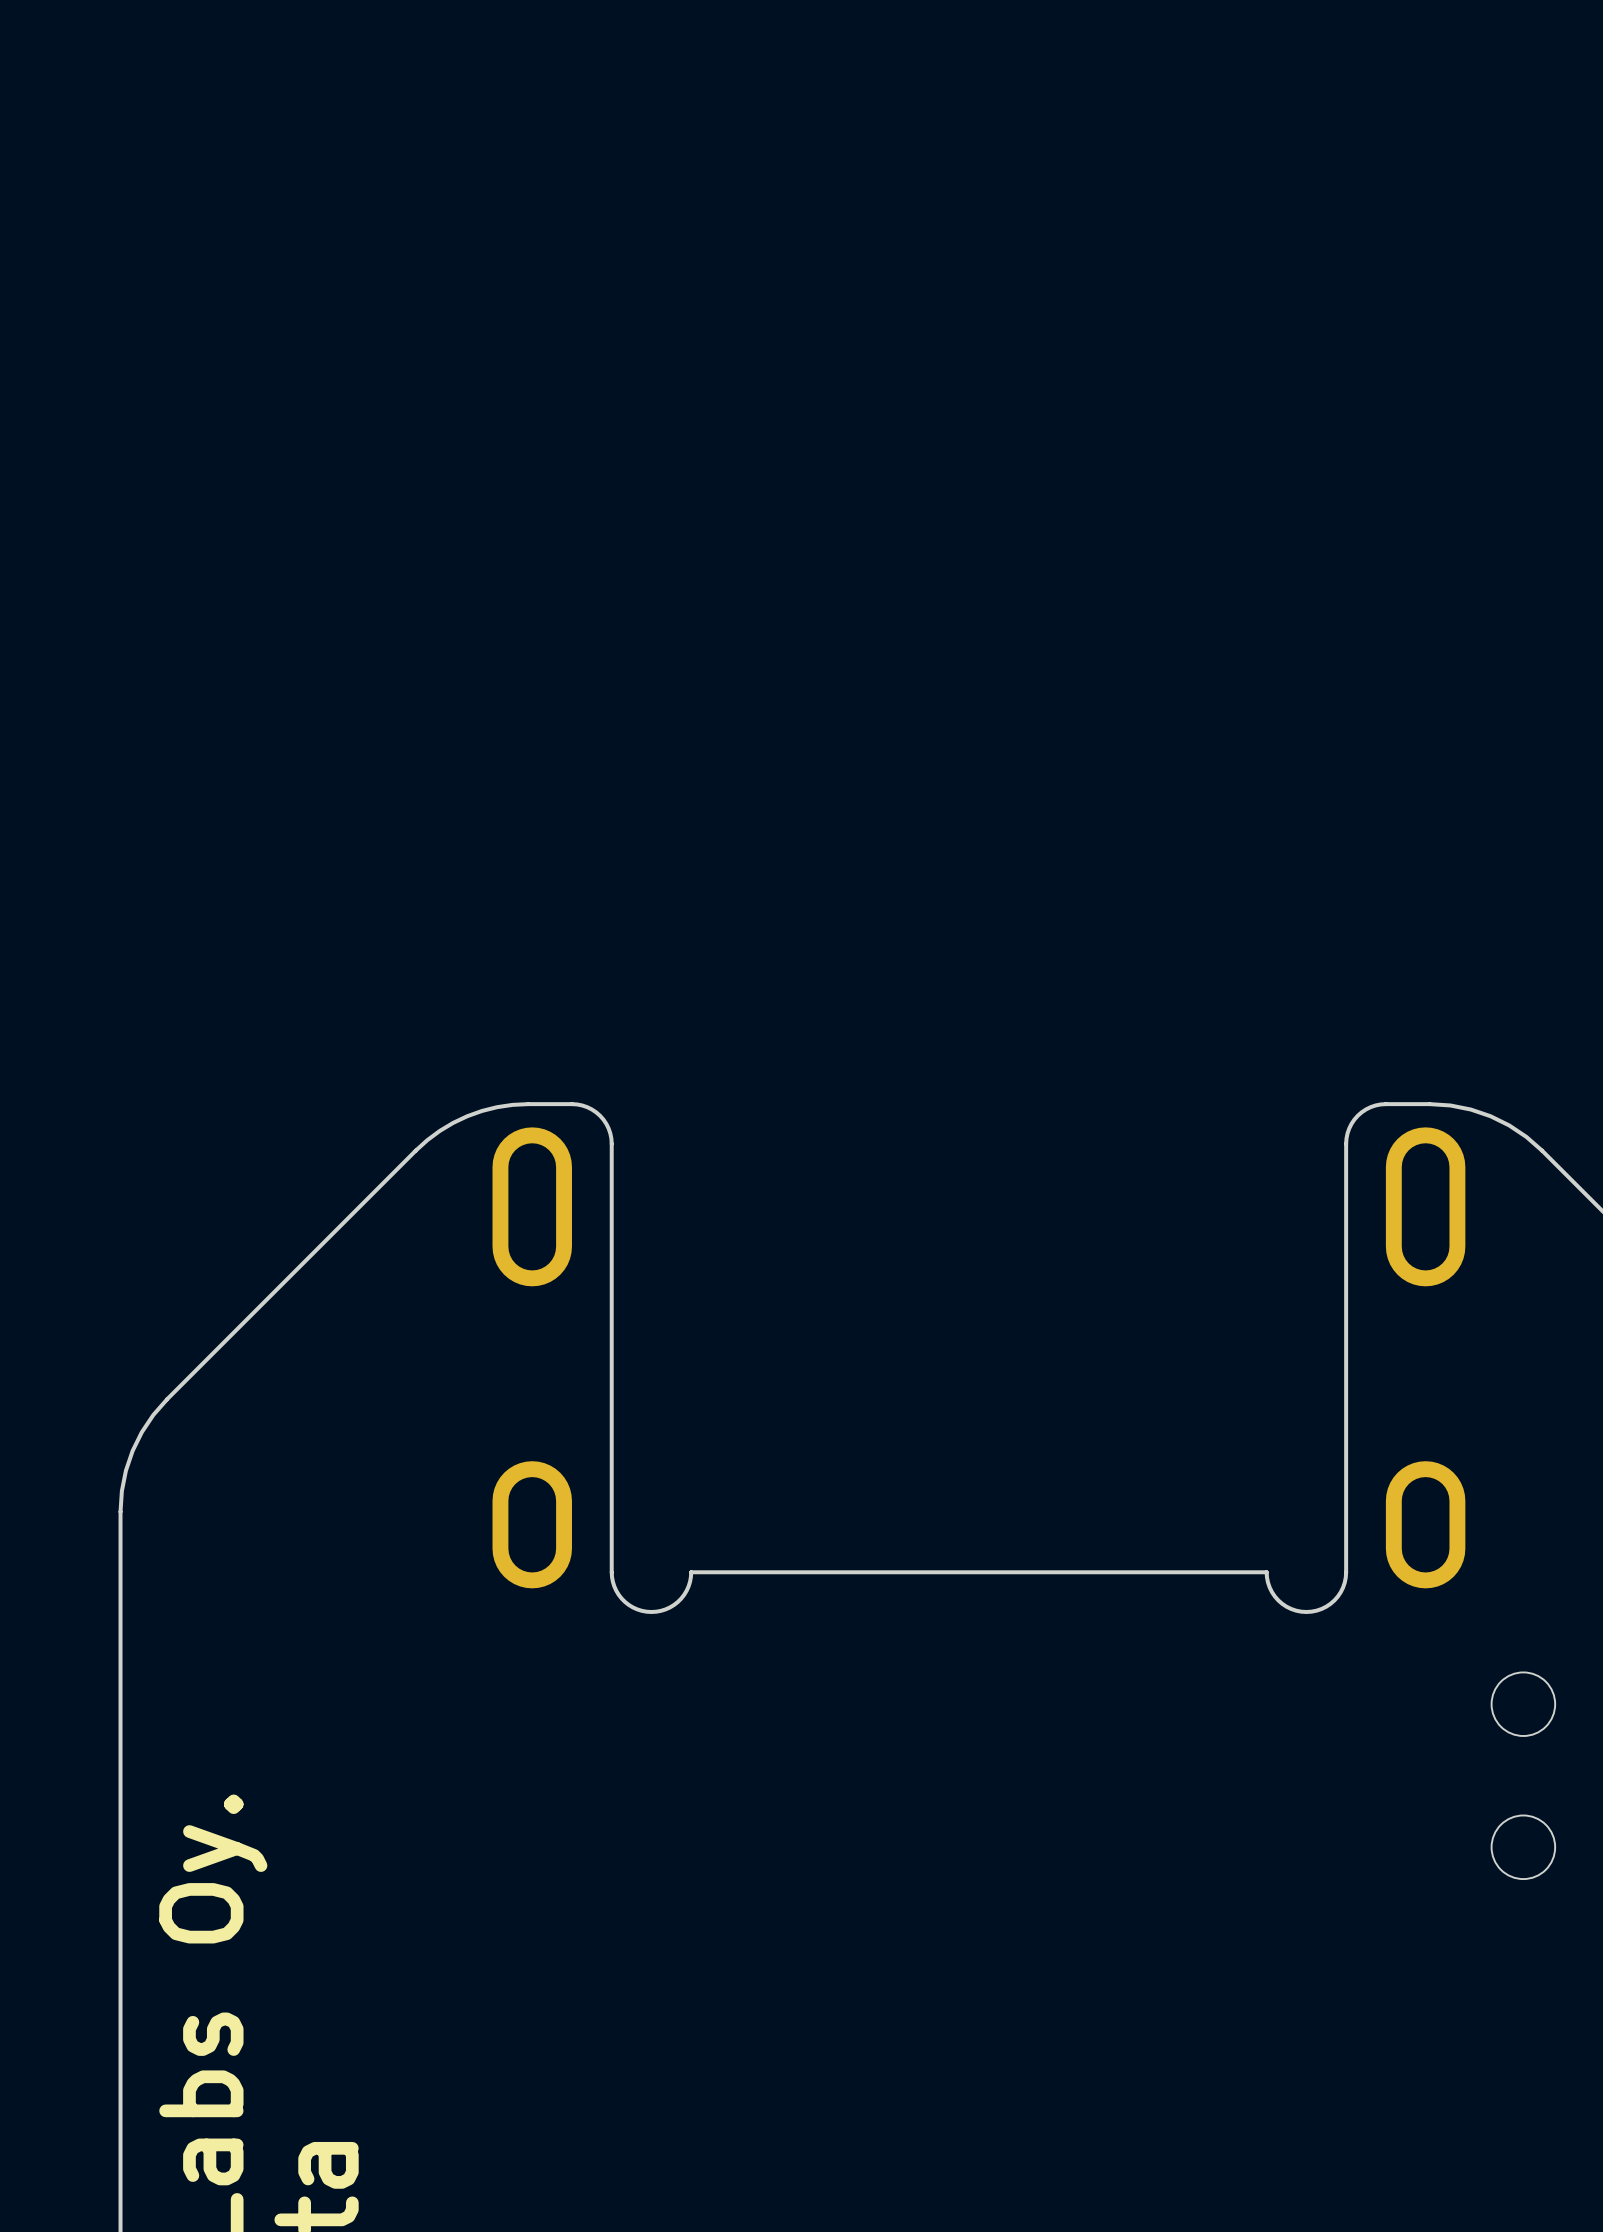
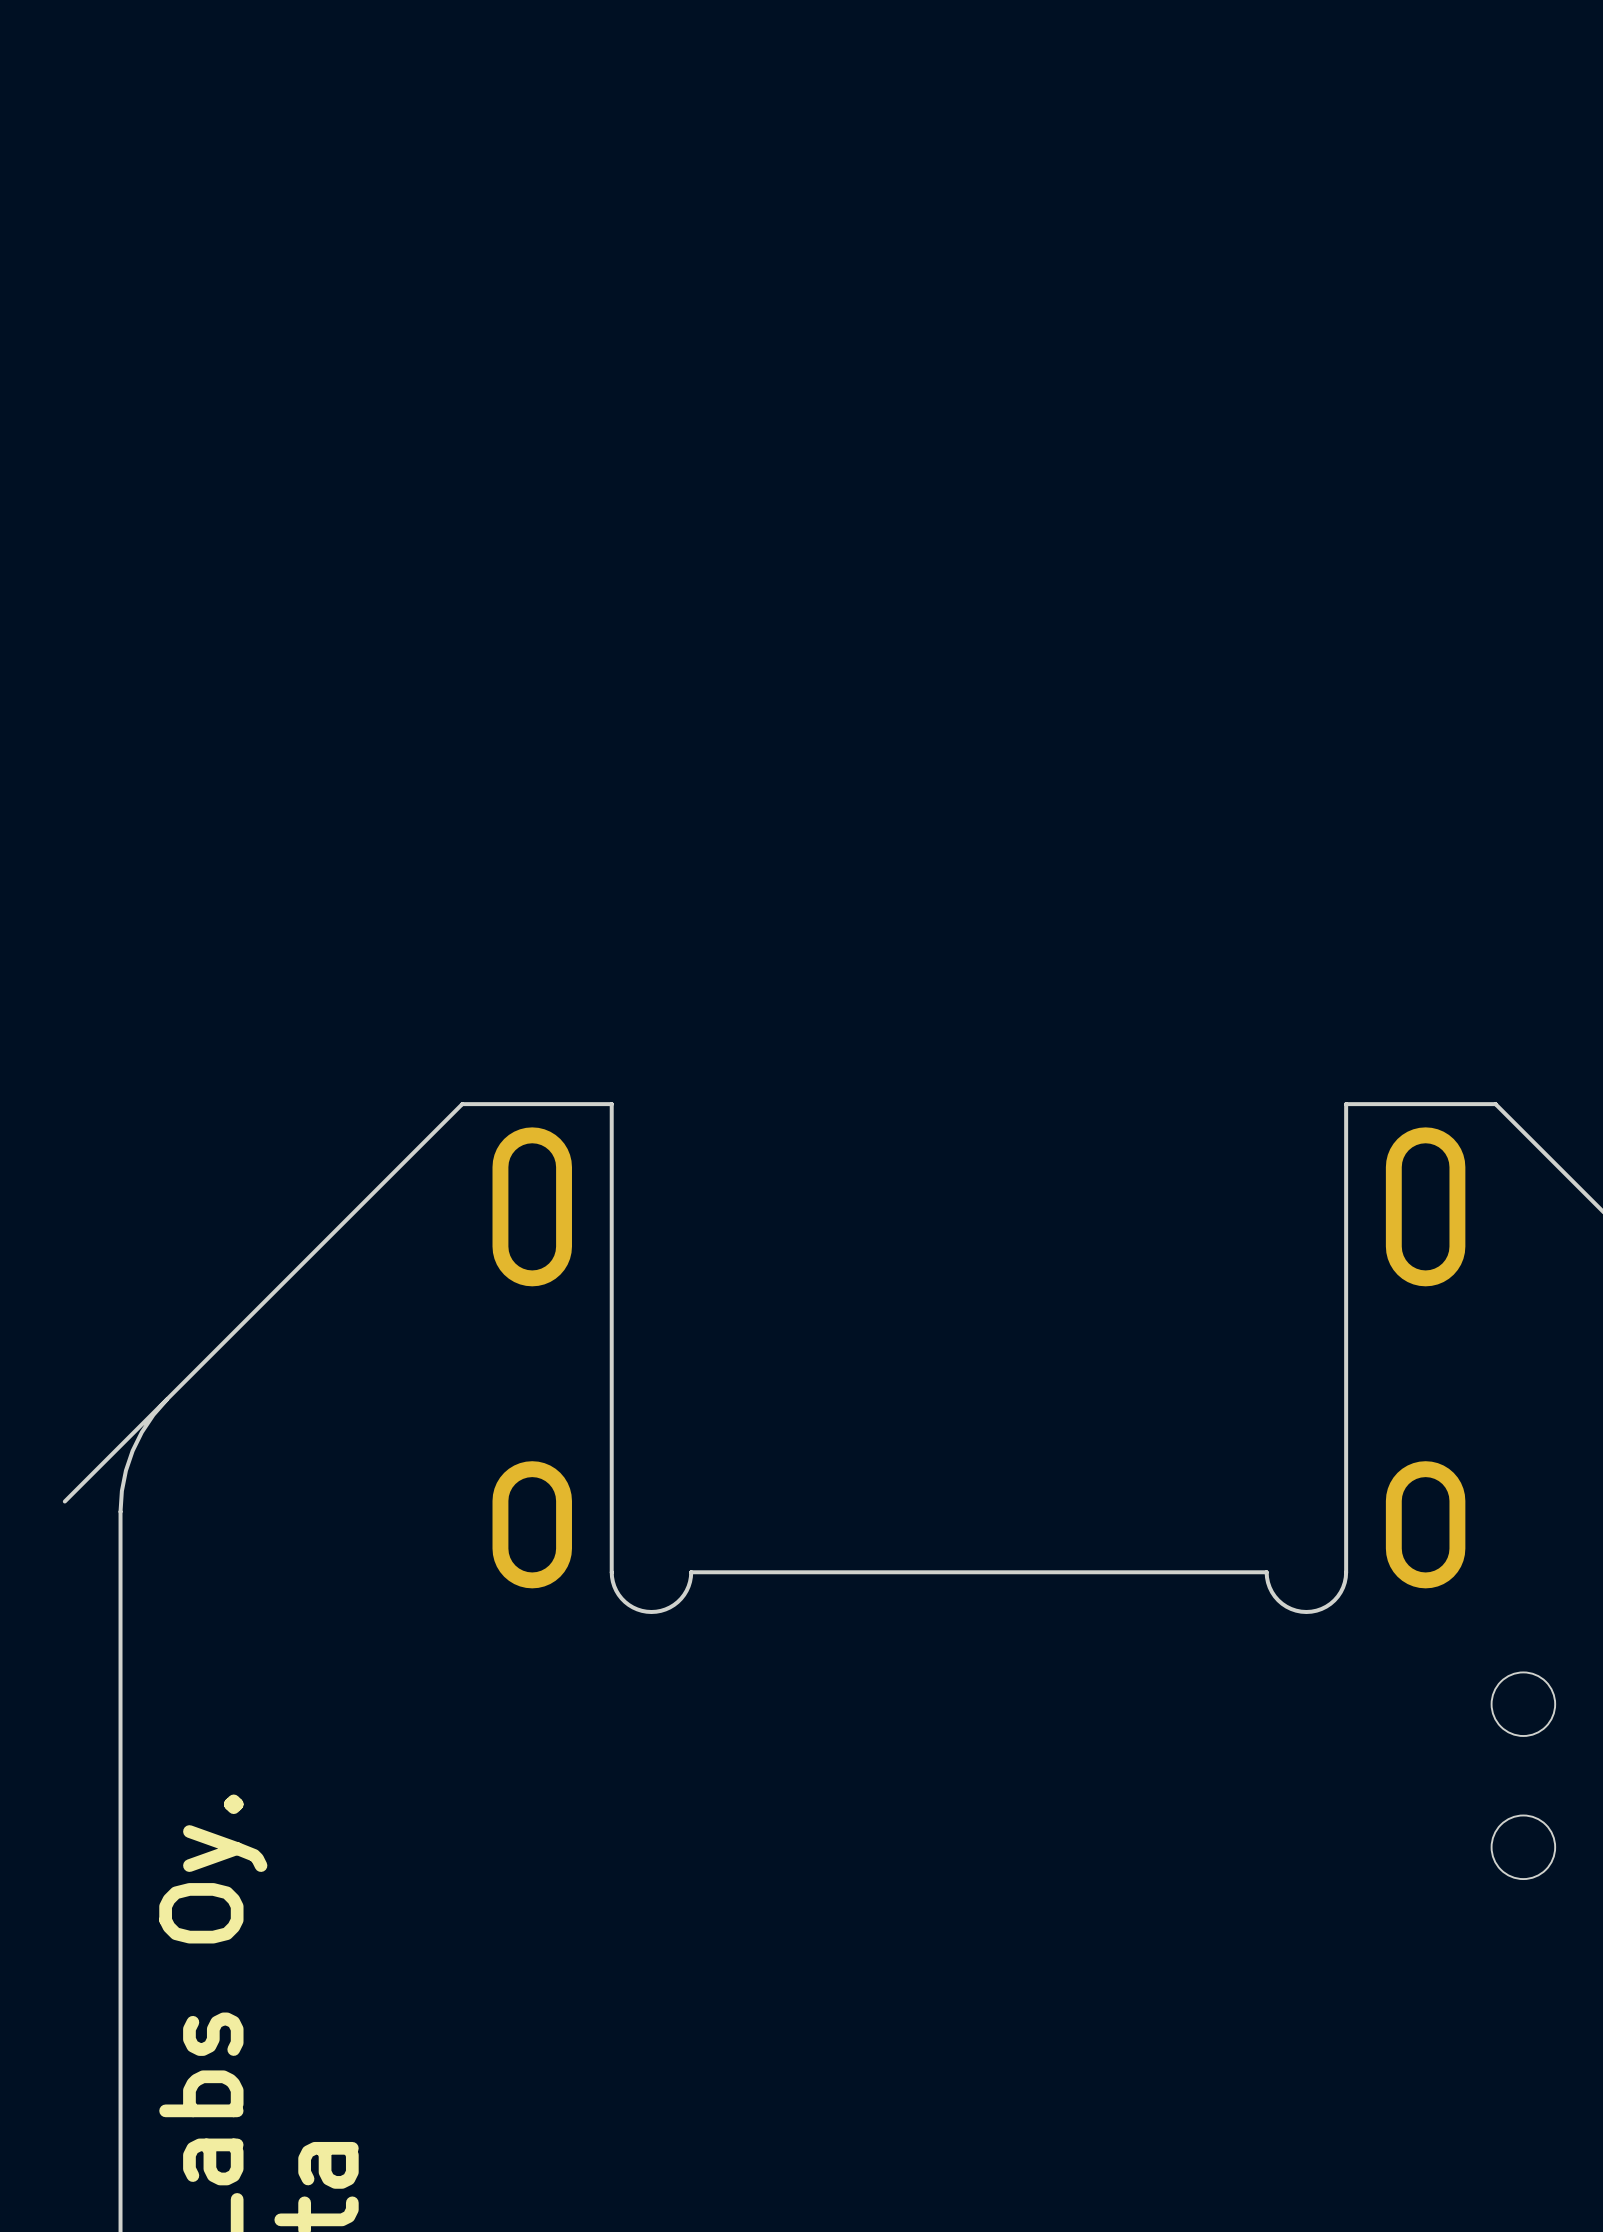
board edge: (528, 1104) (497, 1107) (467, 1116) (453, 1122) (427, 1140) (167, 1399) -> (528, 1104) (462, 1104) (64, 1501)
board edge: (571, 1104) (587, 1107) (600, 1115) (608, 1128) (611, 1143) -> (571, 1104) (611, 1104) (611, 1143)
board edge: (1385, 1104) (1370, 1107) (1357, 1115) (1349, 1128) (1346, 1143) -> (1385, 1104) (1346, 1104) (1346, 1143)
board edge: (1429, 1104) (1450, 1105) (1490, 1116) (1509, 1125) (1542, 1150) -> (1429, 1104) (1495, 1104) (1542, 1150)

